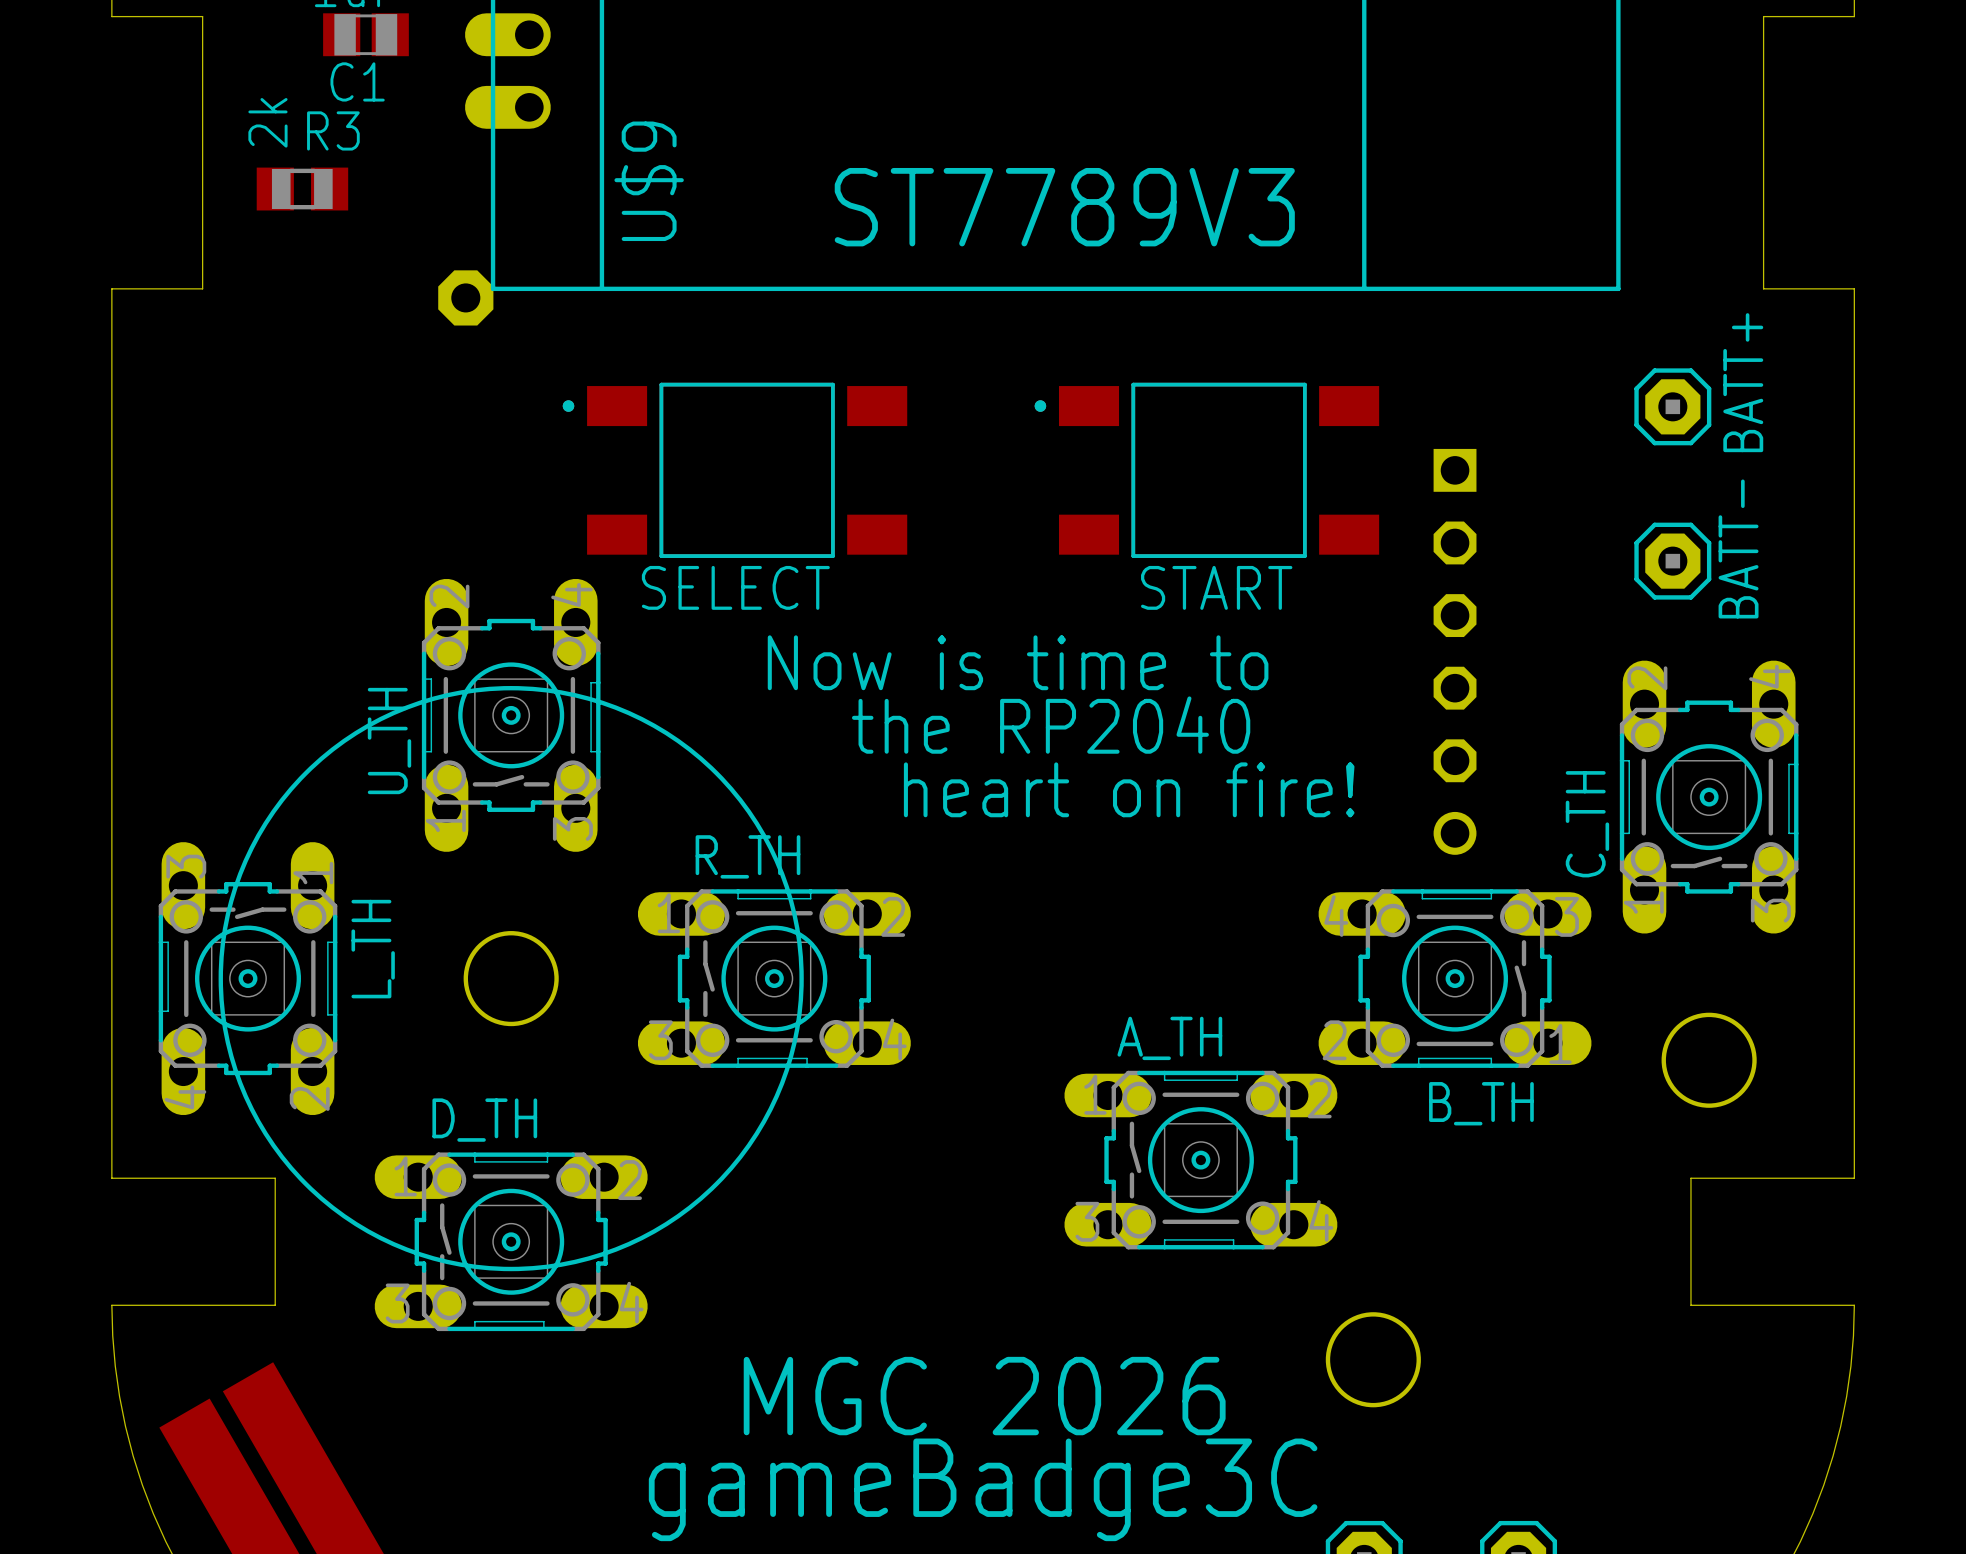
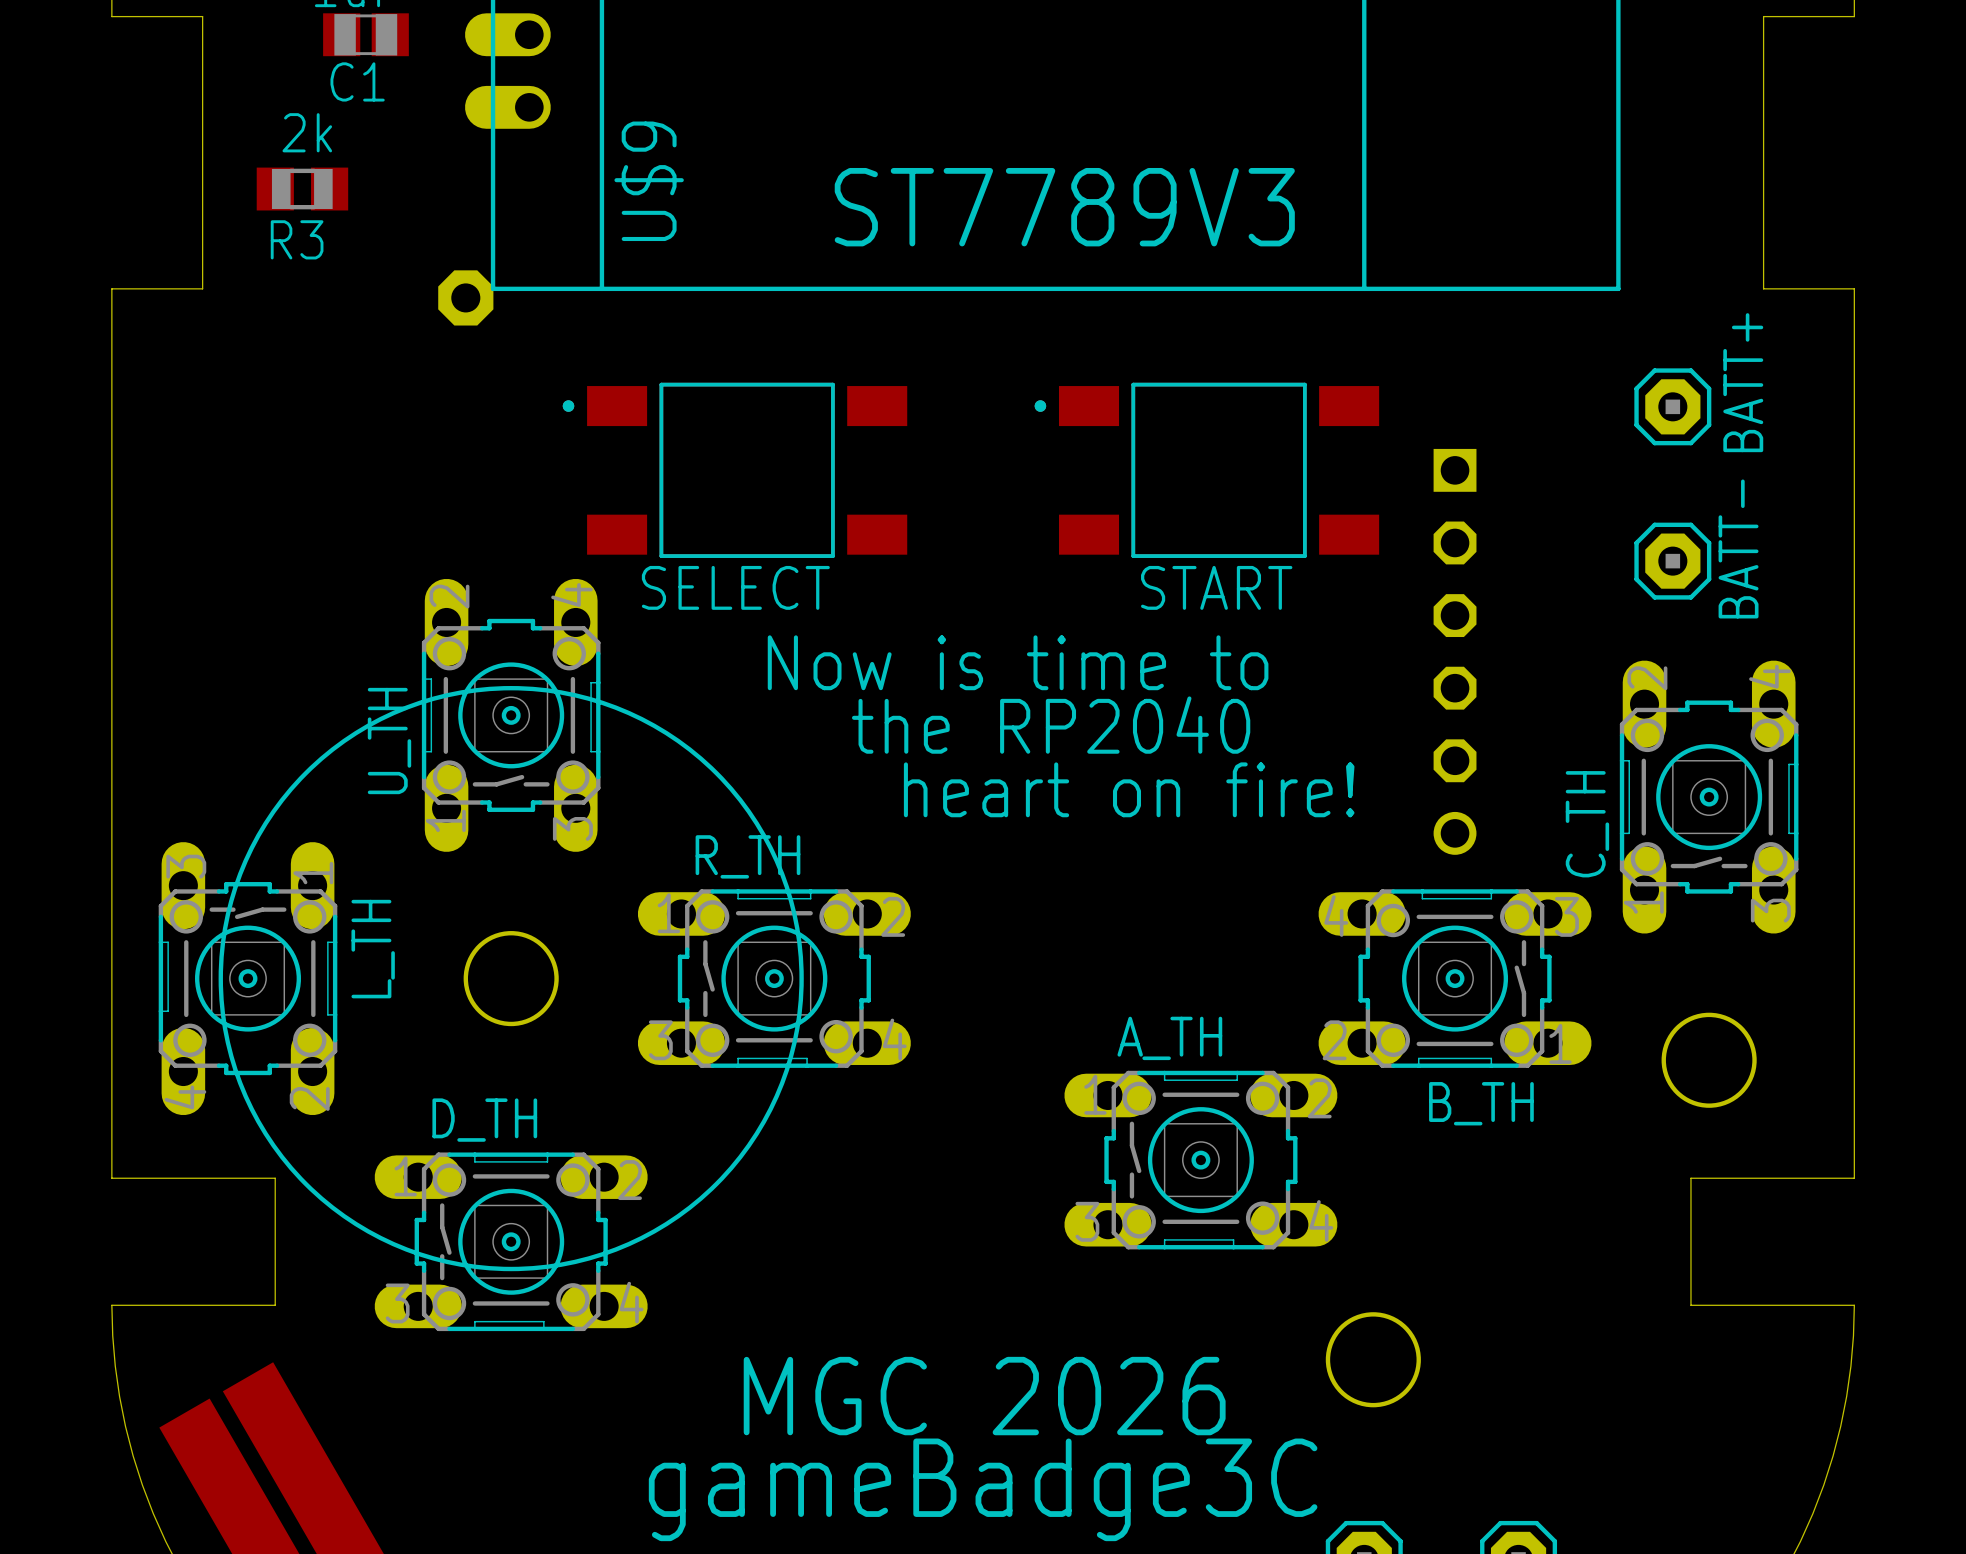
R3 value rotation: 0° (267, 122) -> 90° clockwise (307, 132)
R3 name position: R3 (333, 130) -> R3 (297, 239)

